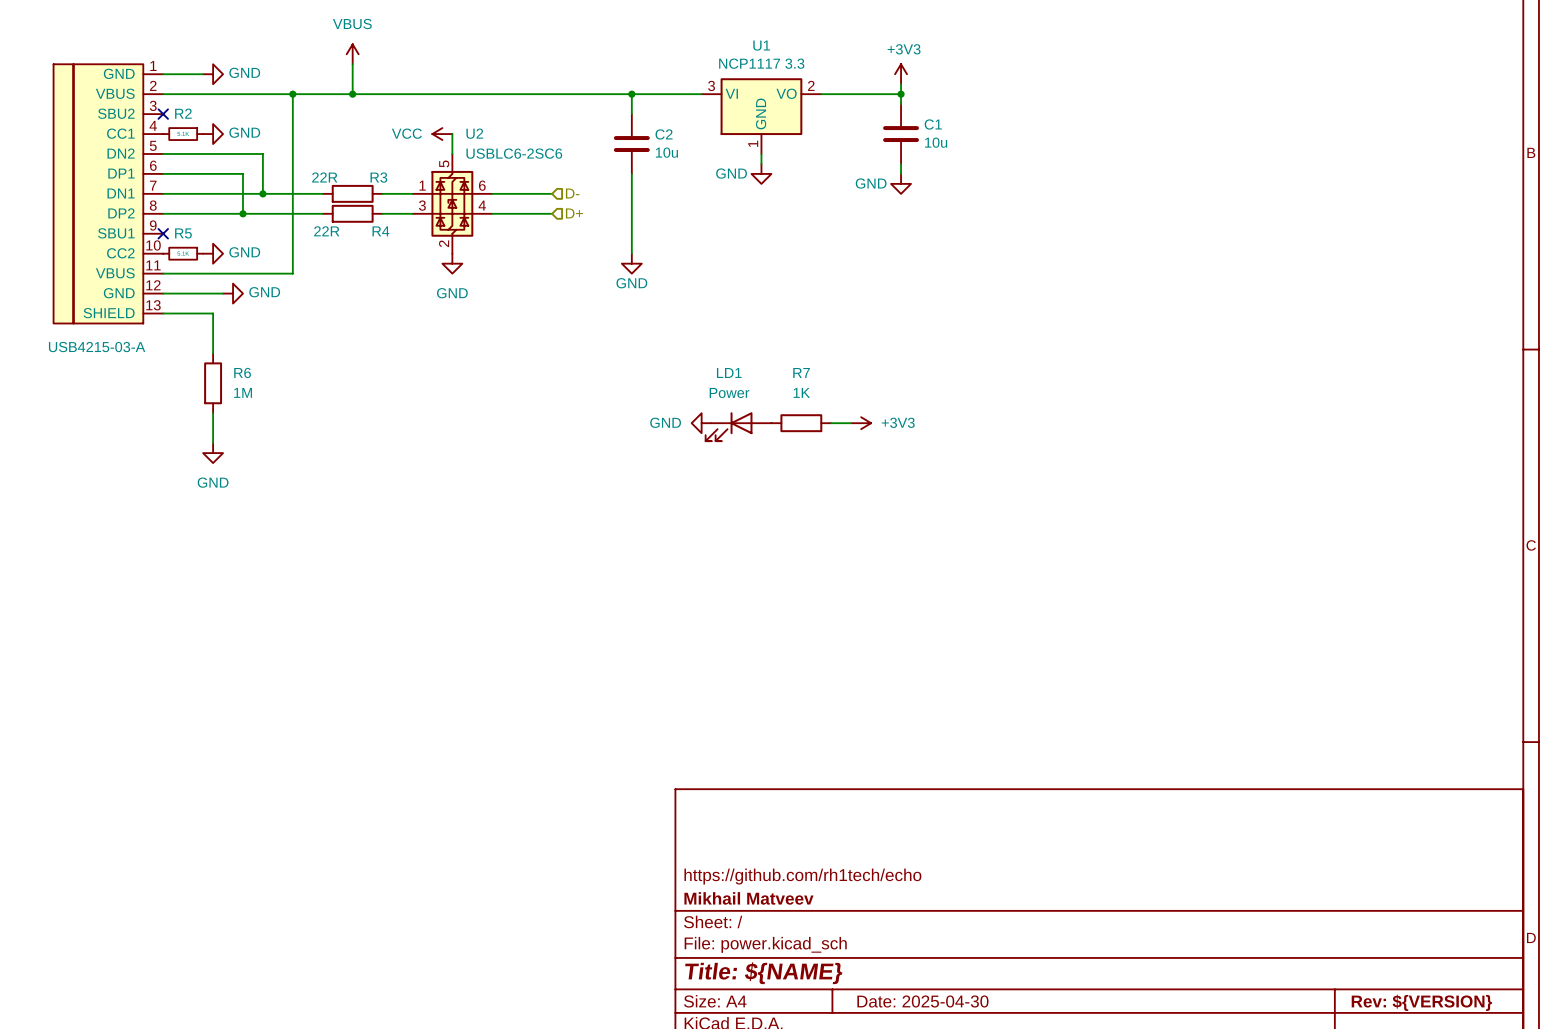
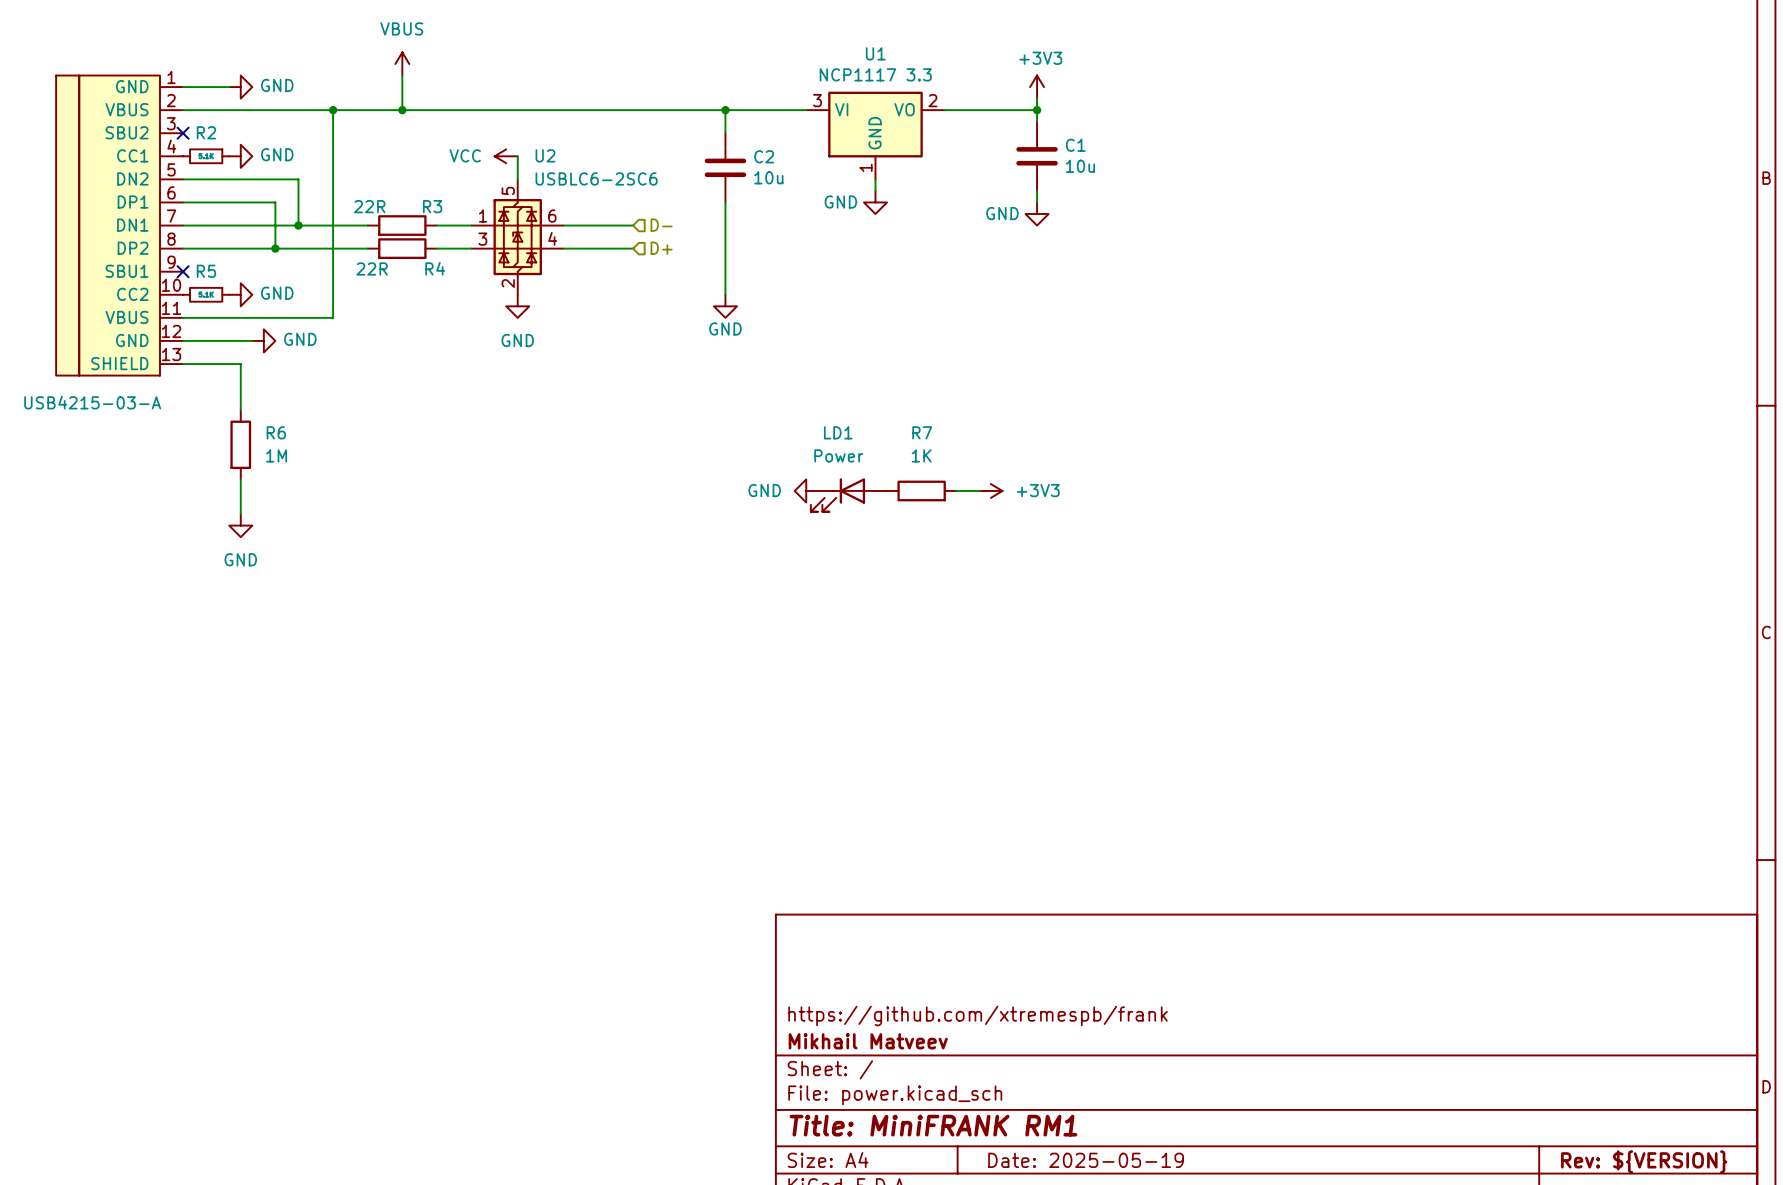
title block: https://github.com/rh1tech/echo (802, 876) -> https://github.com/xtremespb/frank (978, 1015)
title block: Title: ${NAME} (763, 973) -> Title: MiniFRANK RM1 (933, 1125)
title block: Date: 2025-04-30 (922, 1001) -> Date: 2025-05-19 (1086, 1160)

